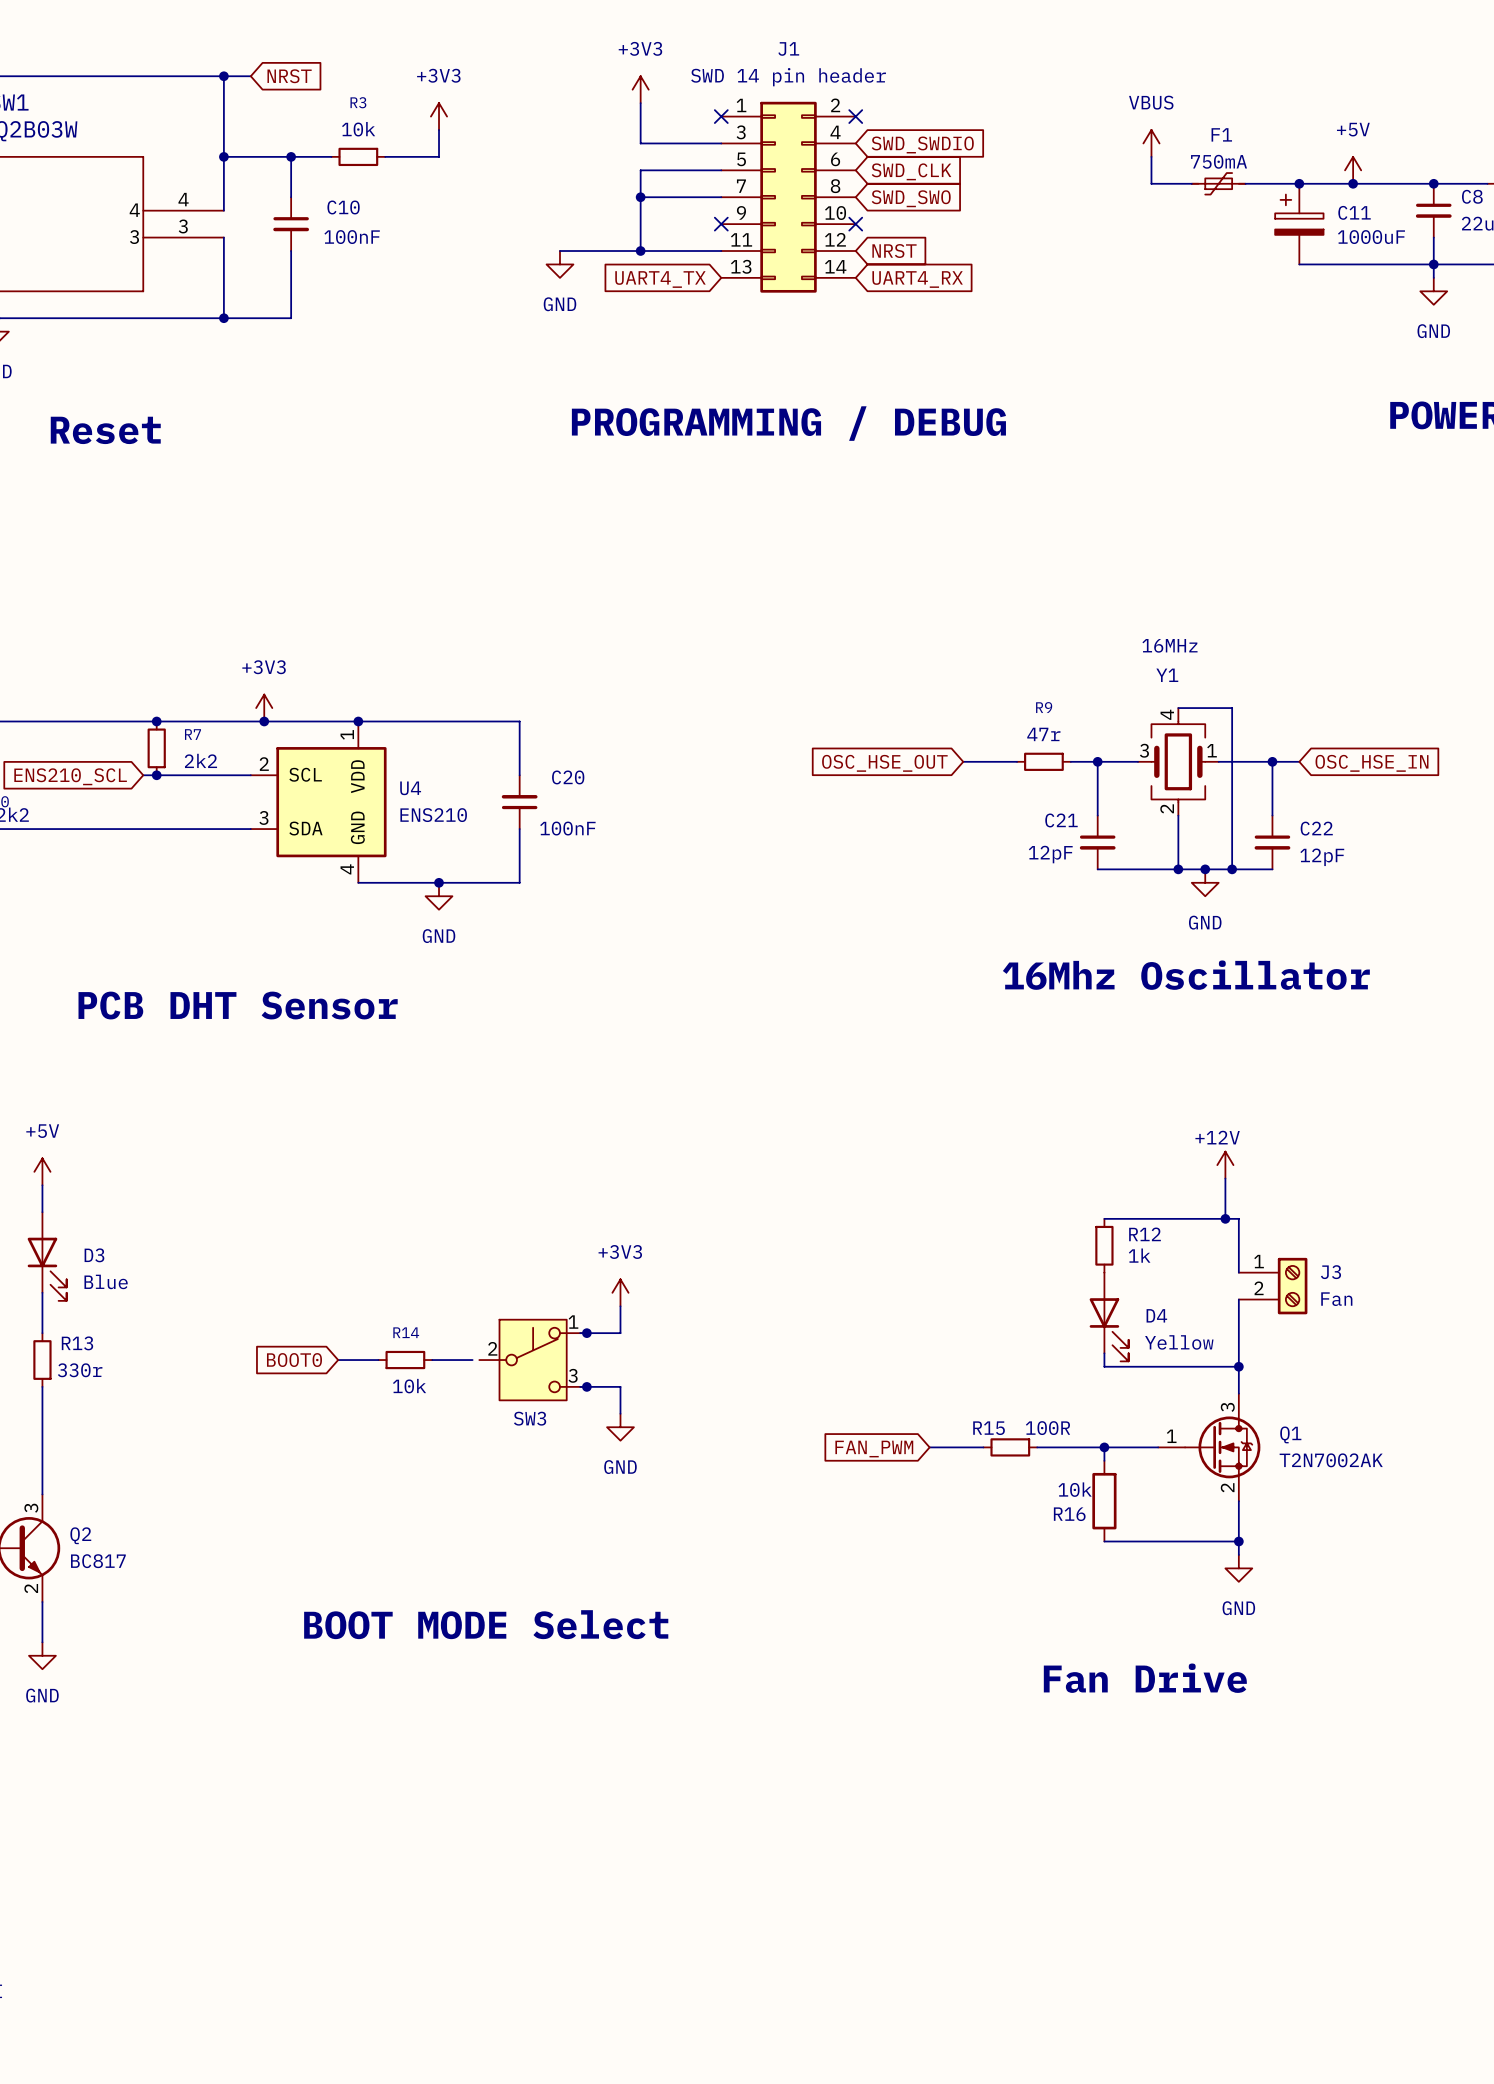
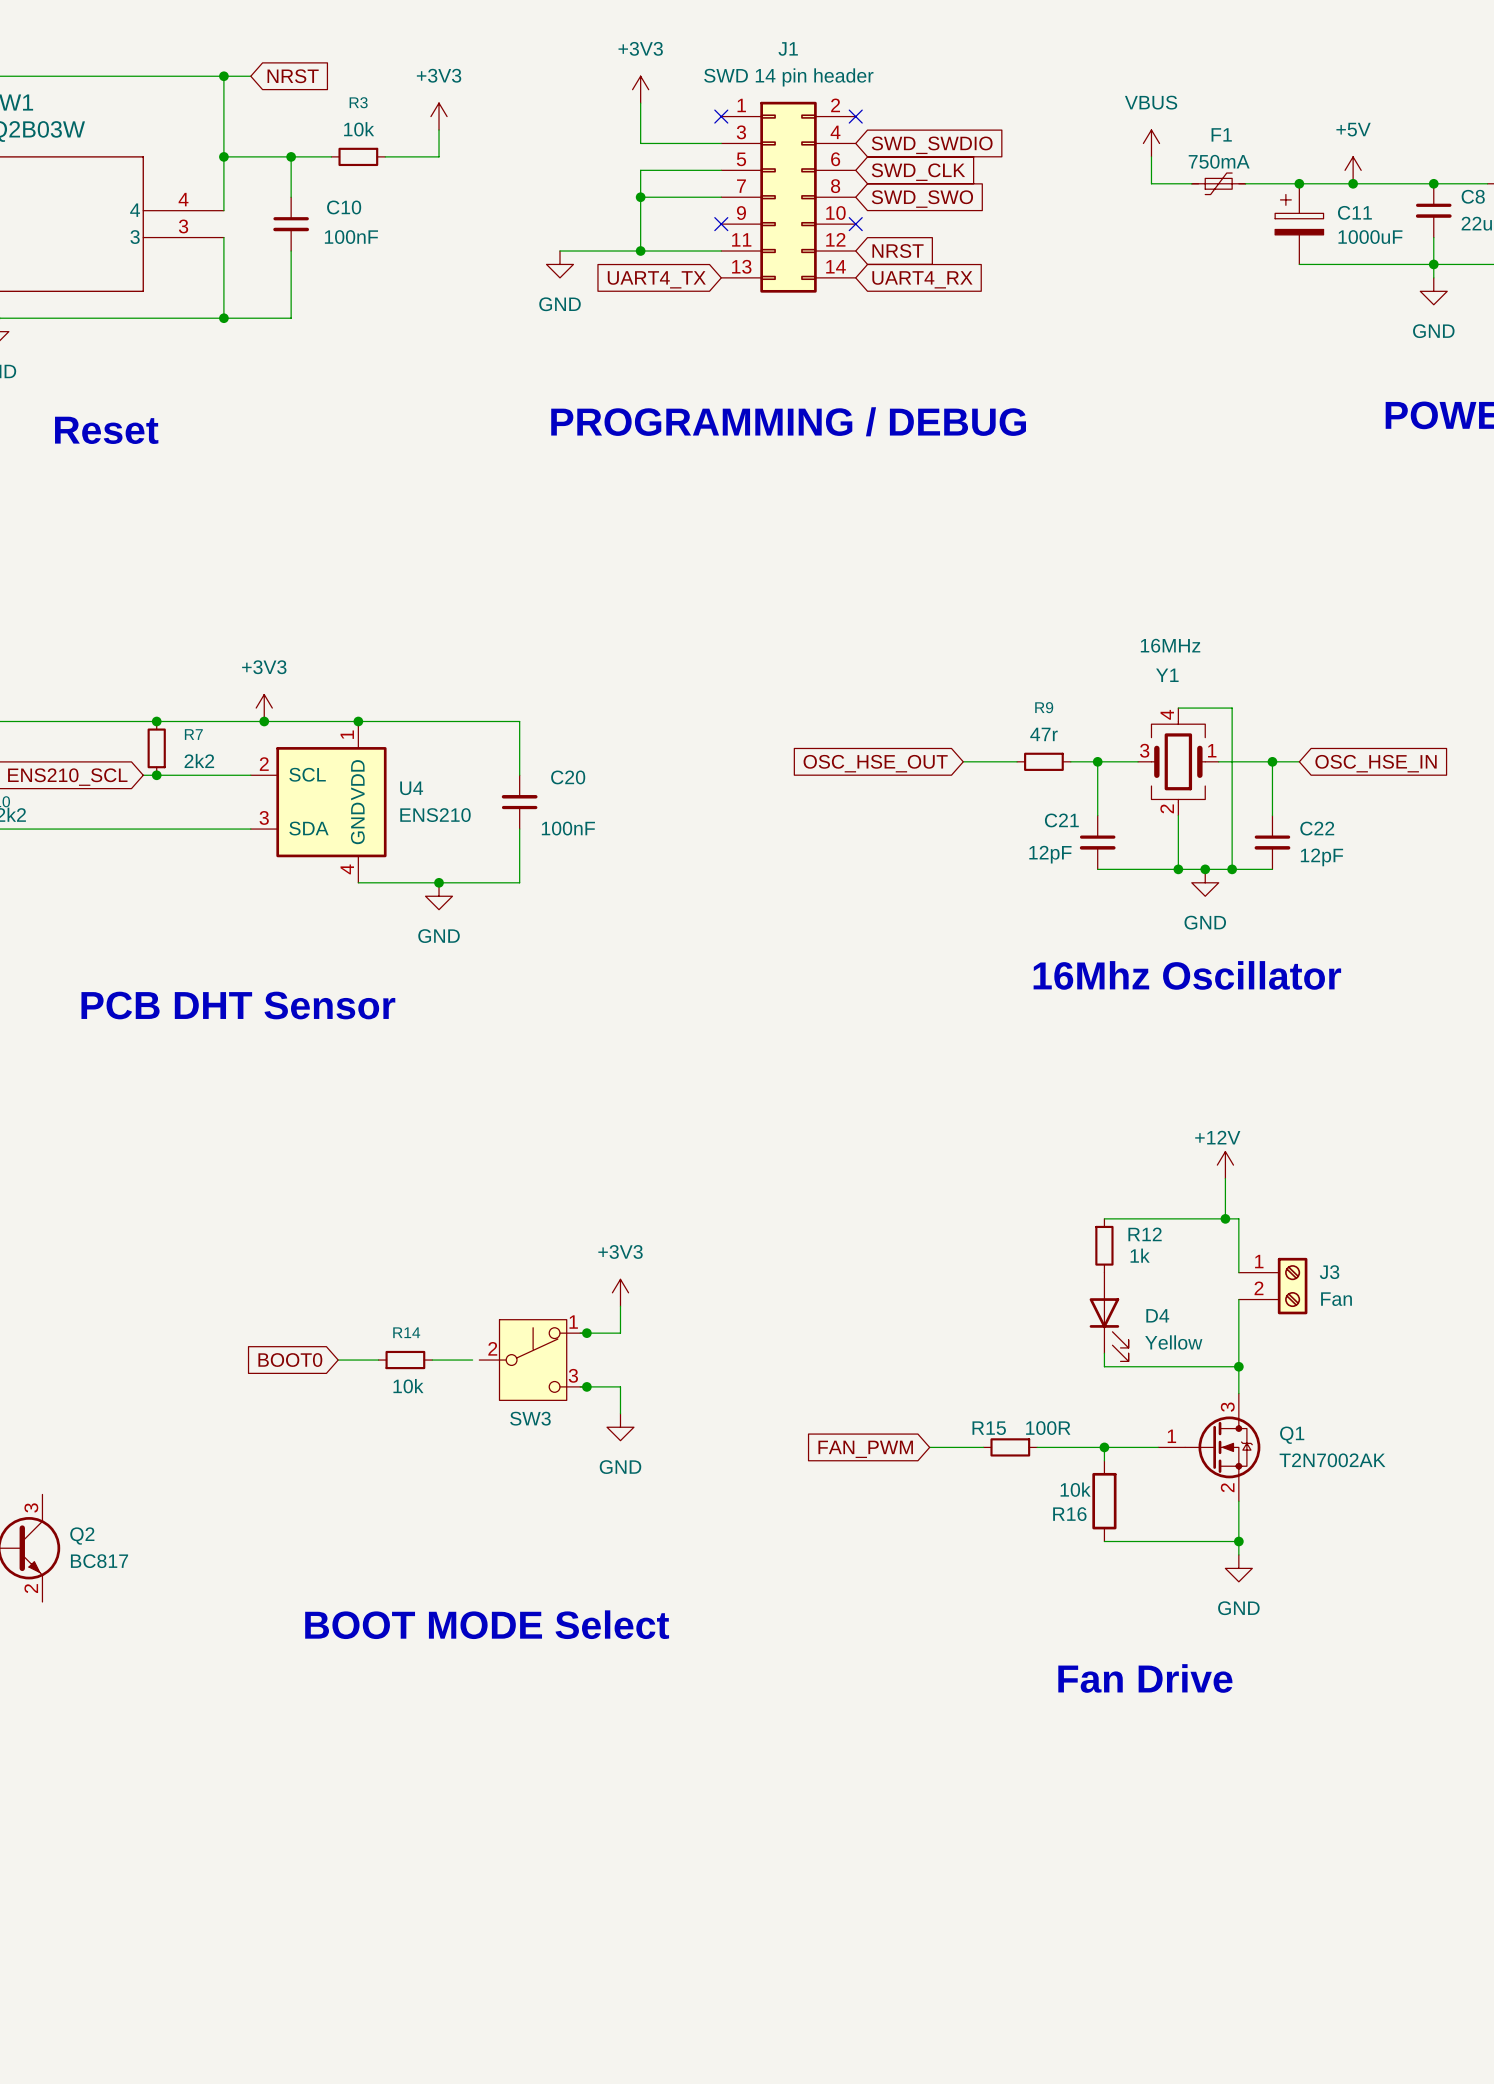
power symbol: +5V (42, 1171) -> none
wire: (42, 1185) (42, 1212) -> none
D3: Blue (47, 1256) -> none
wire: (42, 1292) (42, 1333) -> none
R13: 330r (42, 1360) -> none
wire: (42, 1386) (42, 1494) -> none
wire: (42, 1601) (42, 1642) -> none
power symbol: GND (42, 1655) -> none

